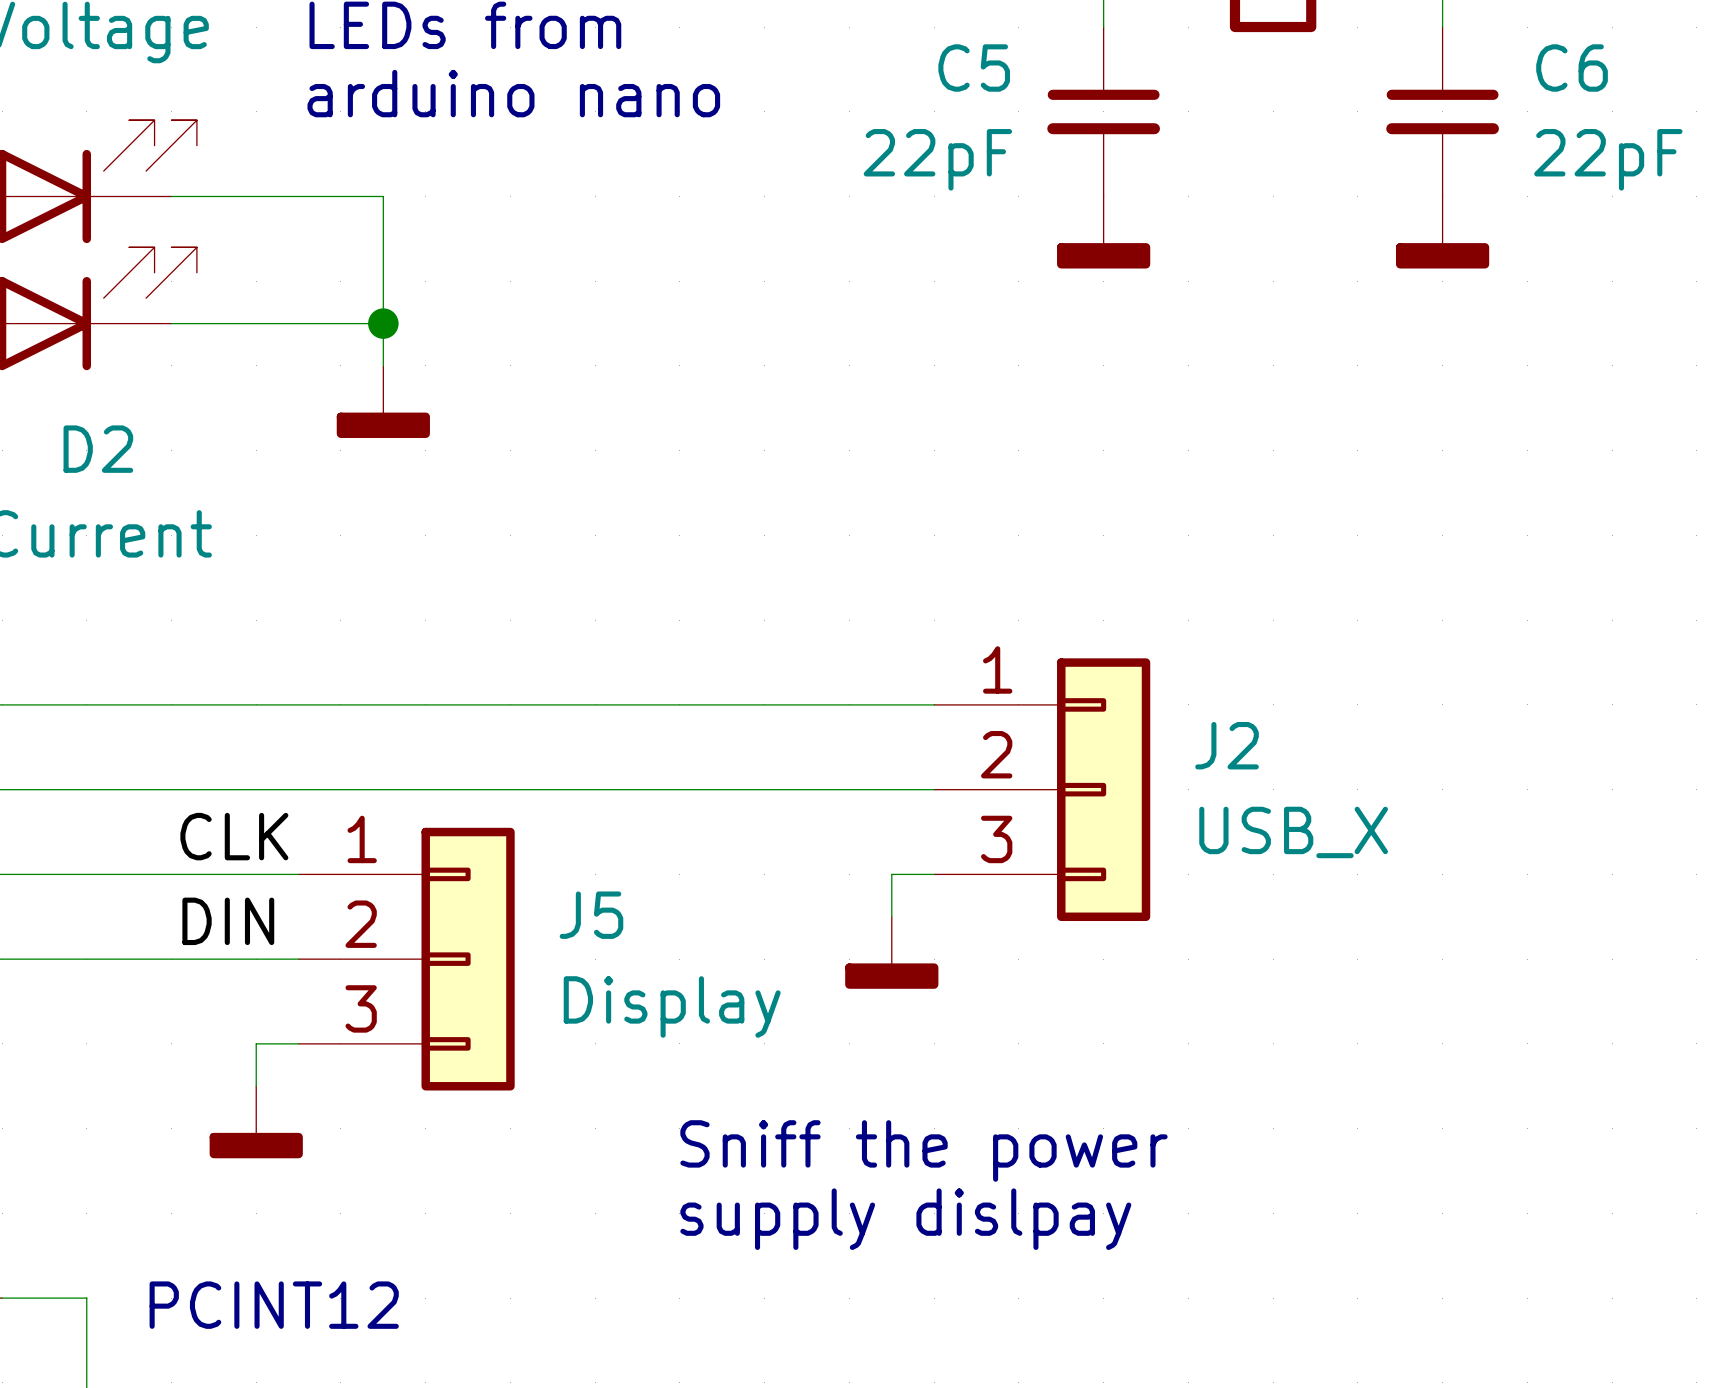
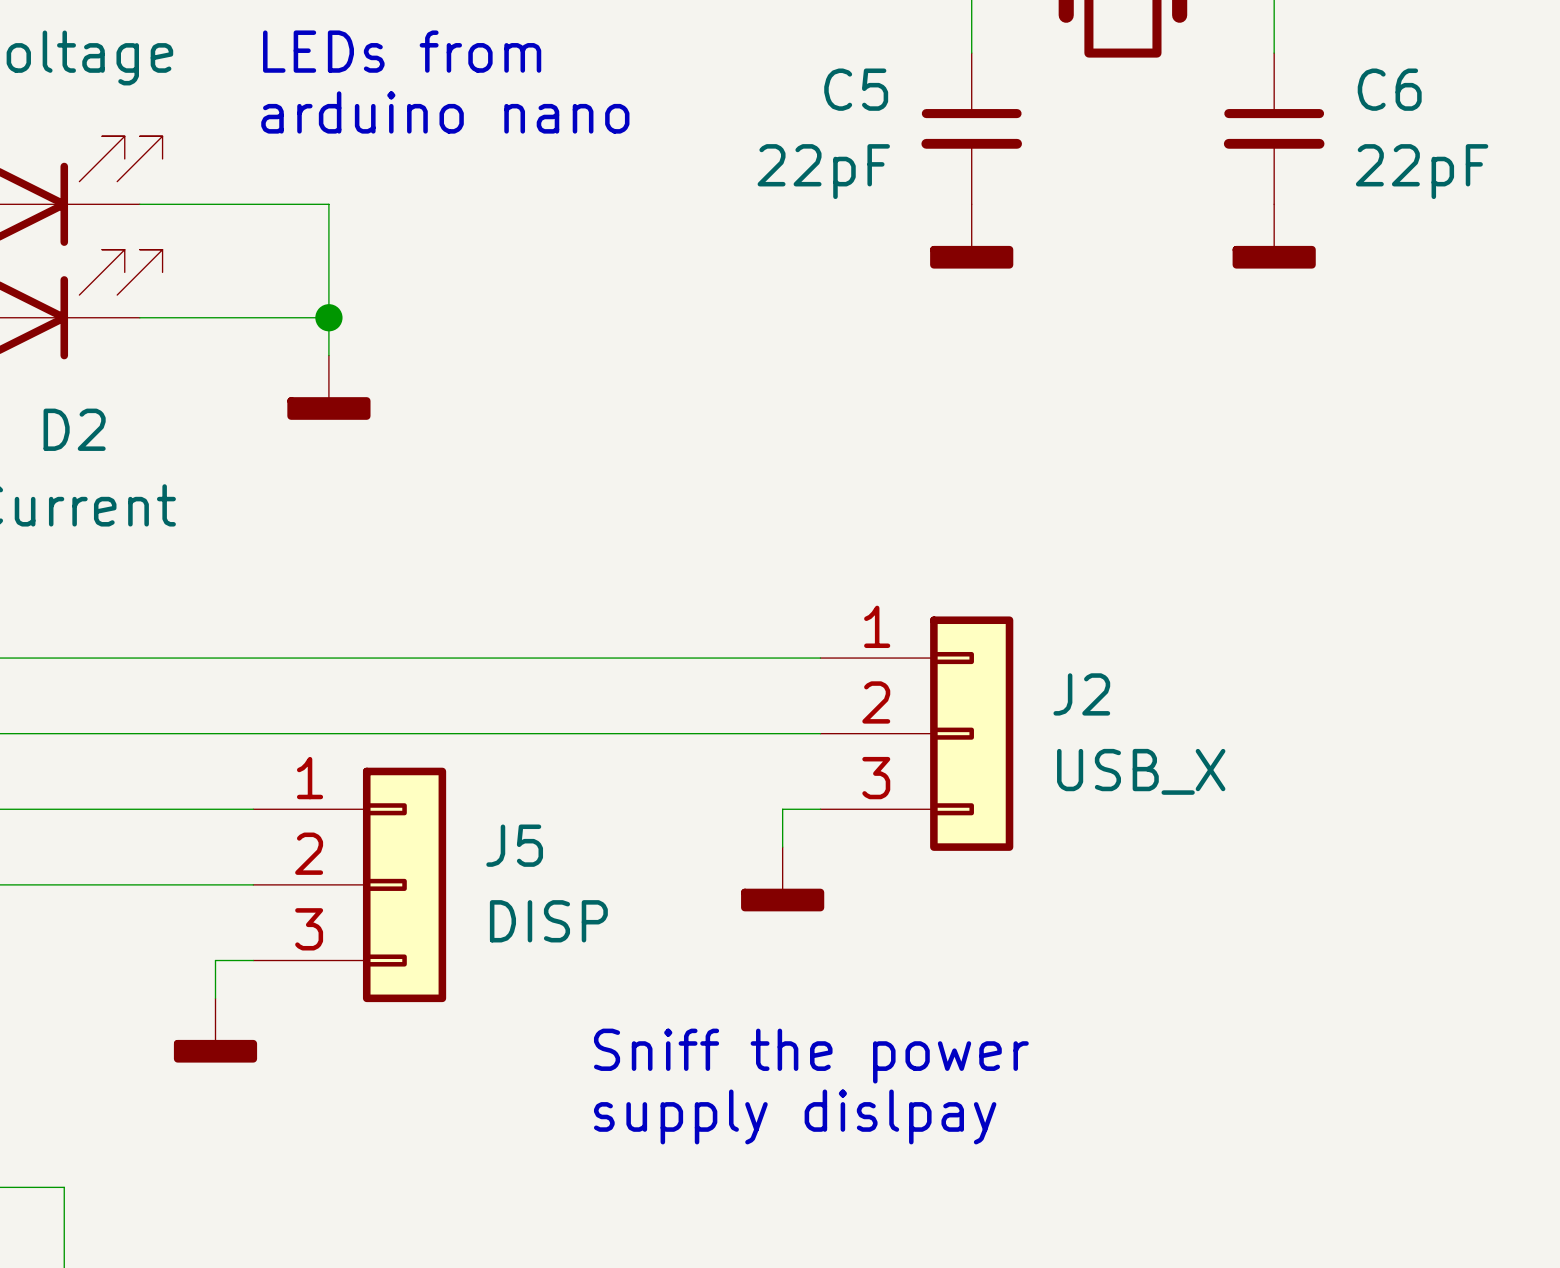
label: CLK (234, 836) -> none
label: DIN (228, 921) -> none
J5 value: Display (672, 1006) -> DISP (548, 921)
text: PCINT12 (274, 1305) -> none

